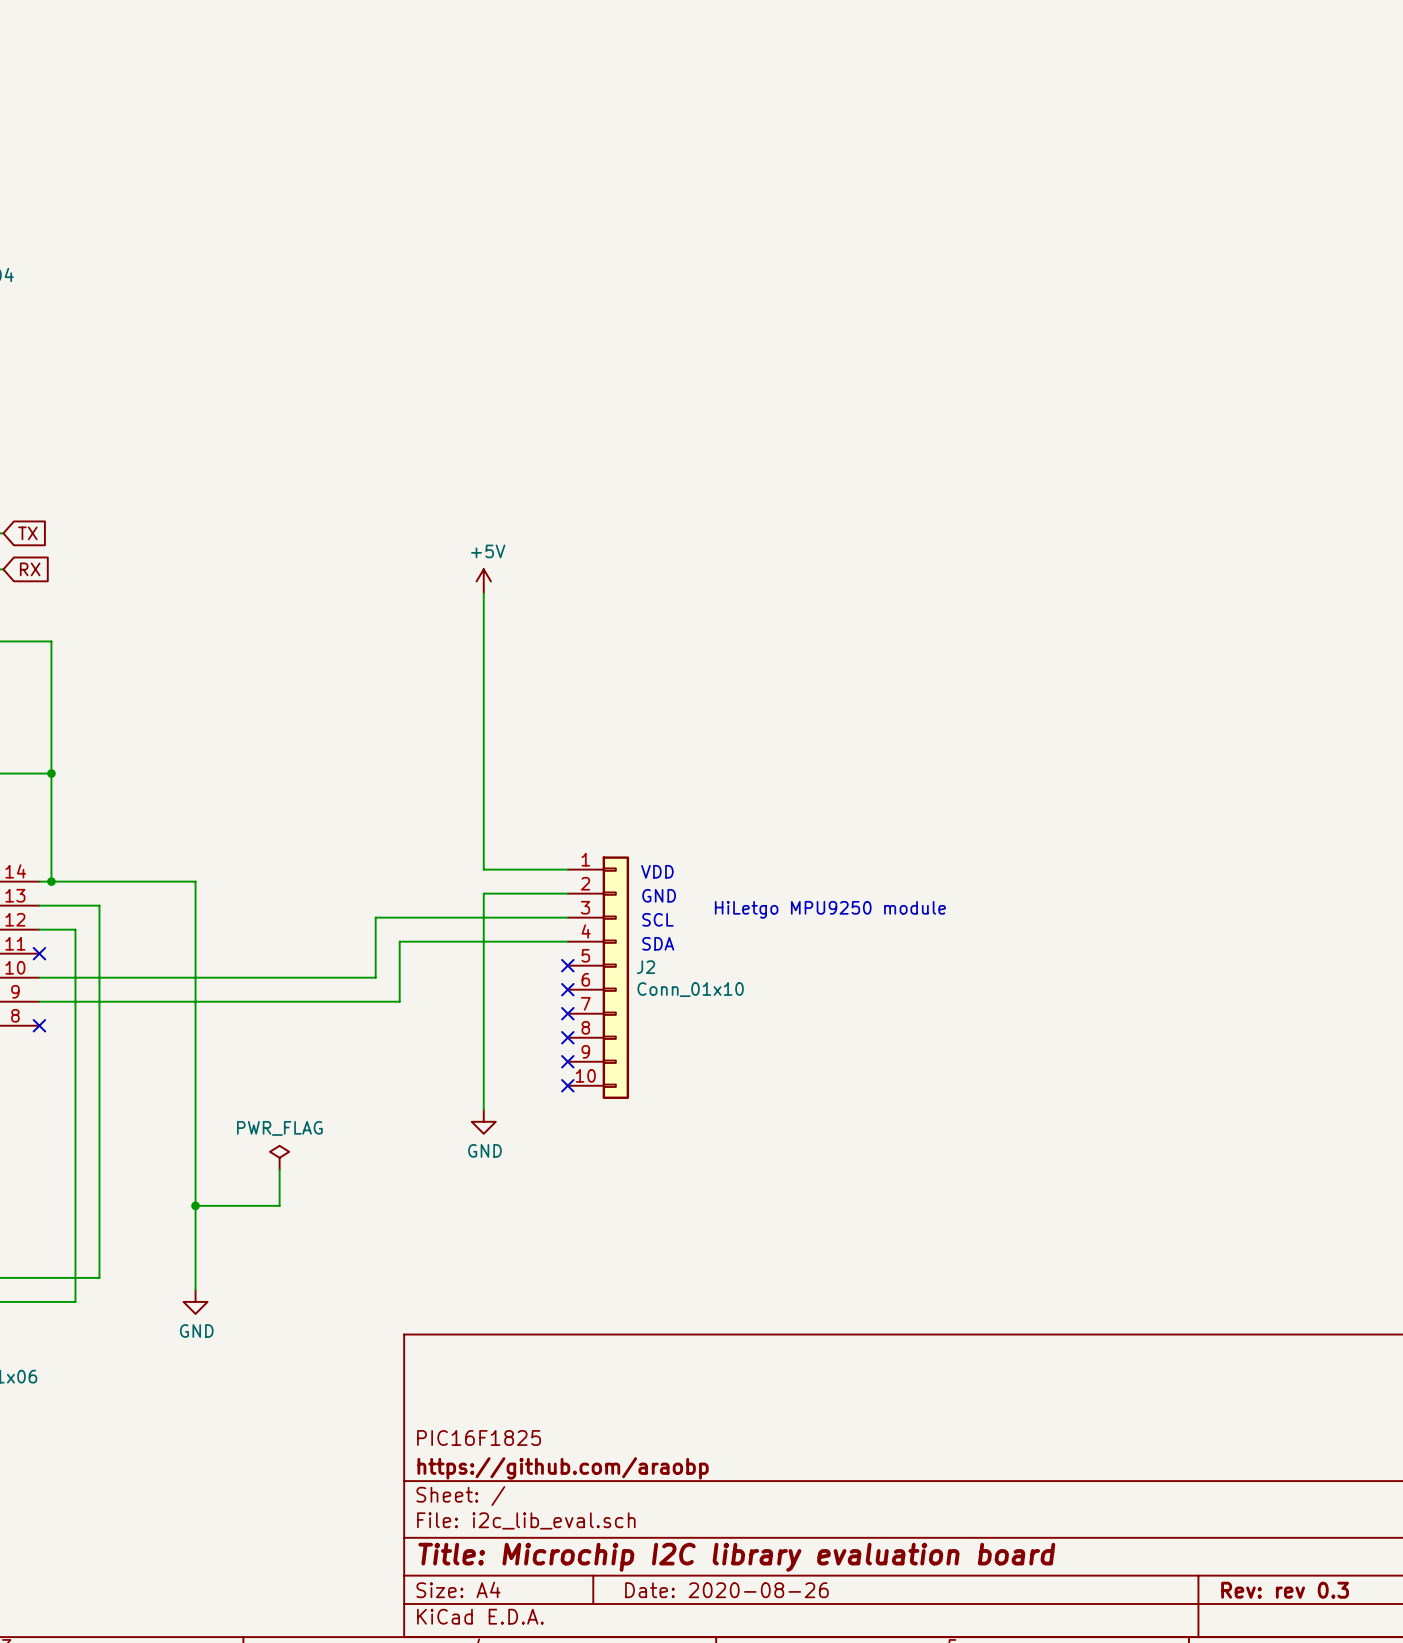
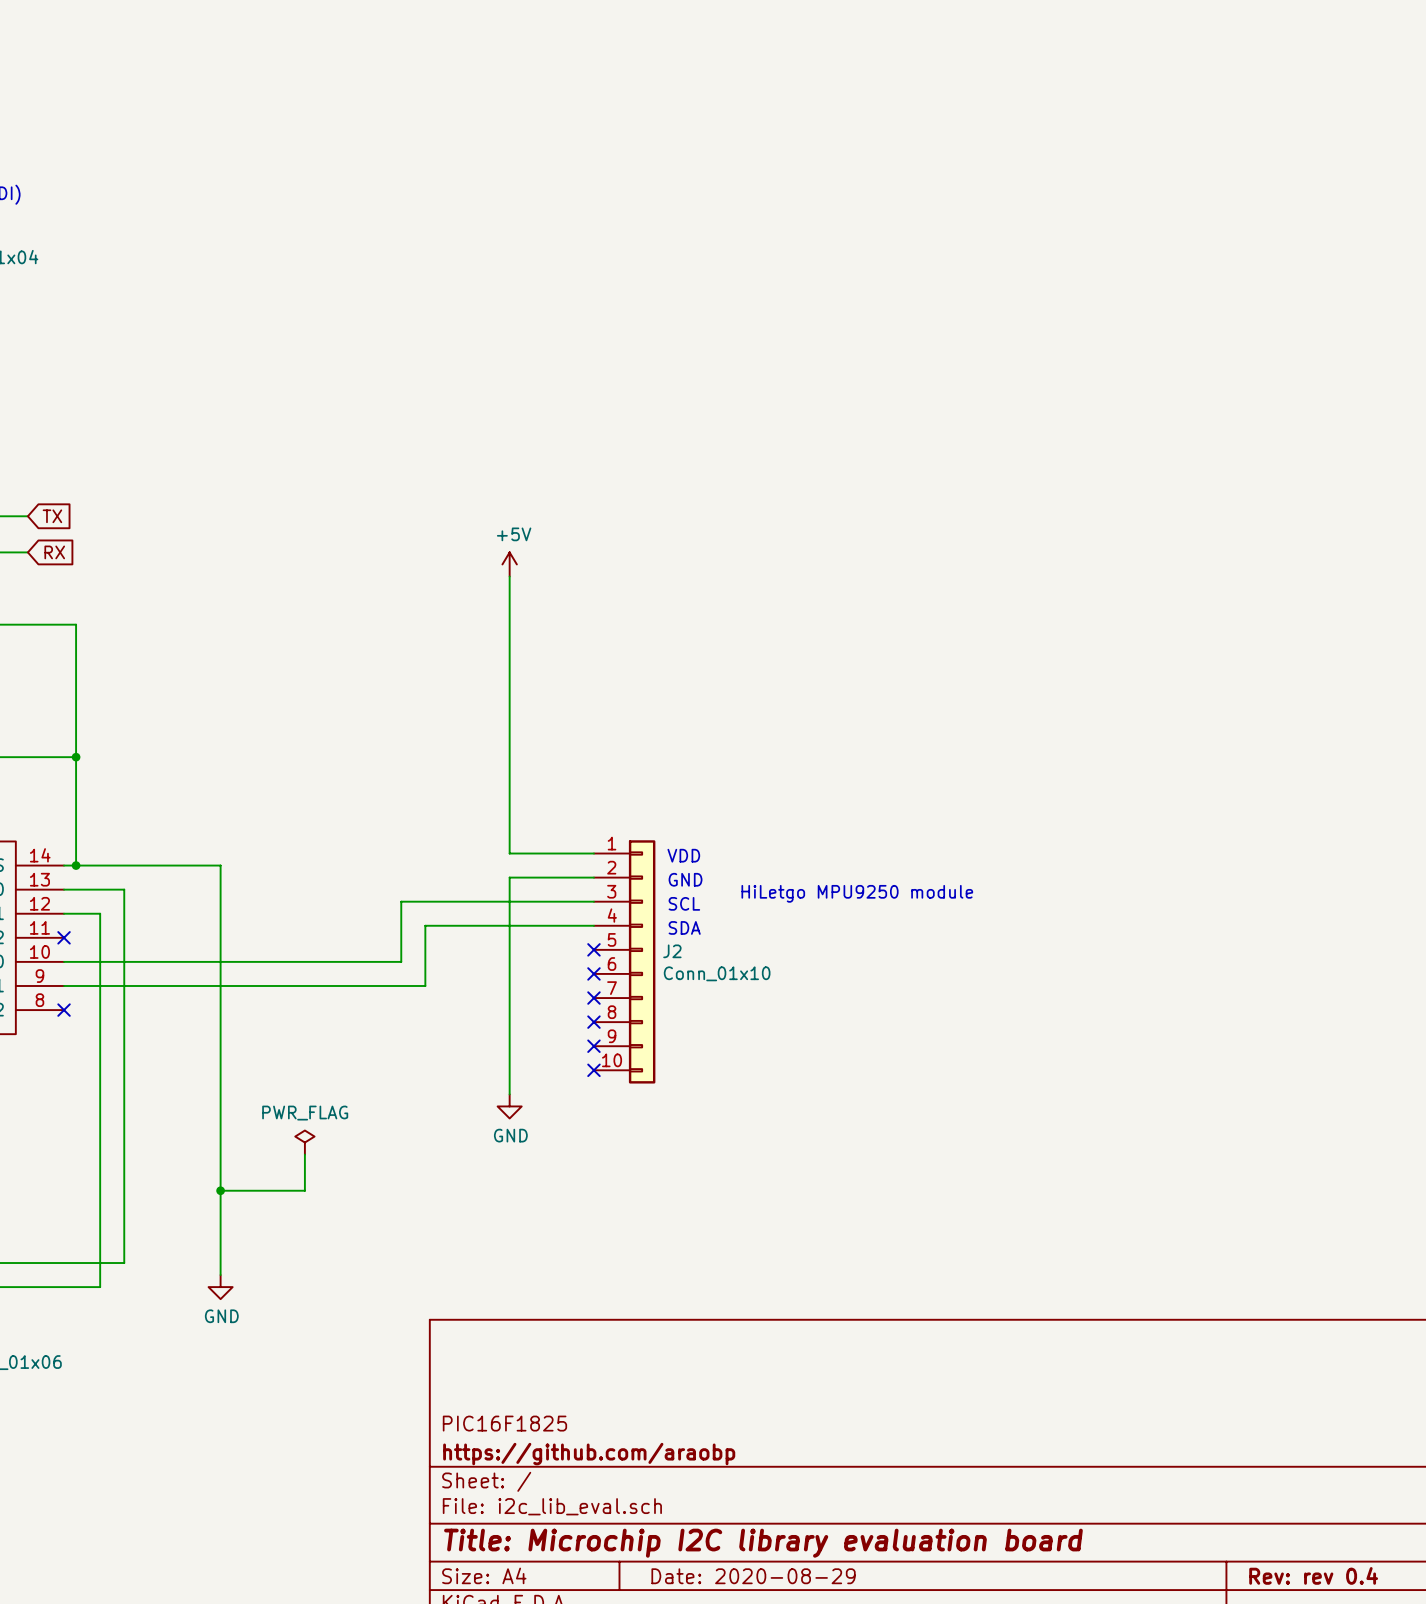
title block: Date: 2020-08-26 (726, 1590) -> Date: 2020-08-29 (753, 1576)
title block: Rev: rev 0.3 (1285, 1590) -> Rev: rev 0.4 (1313, 1575)

